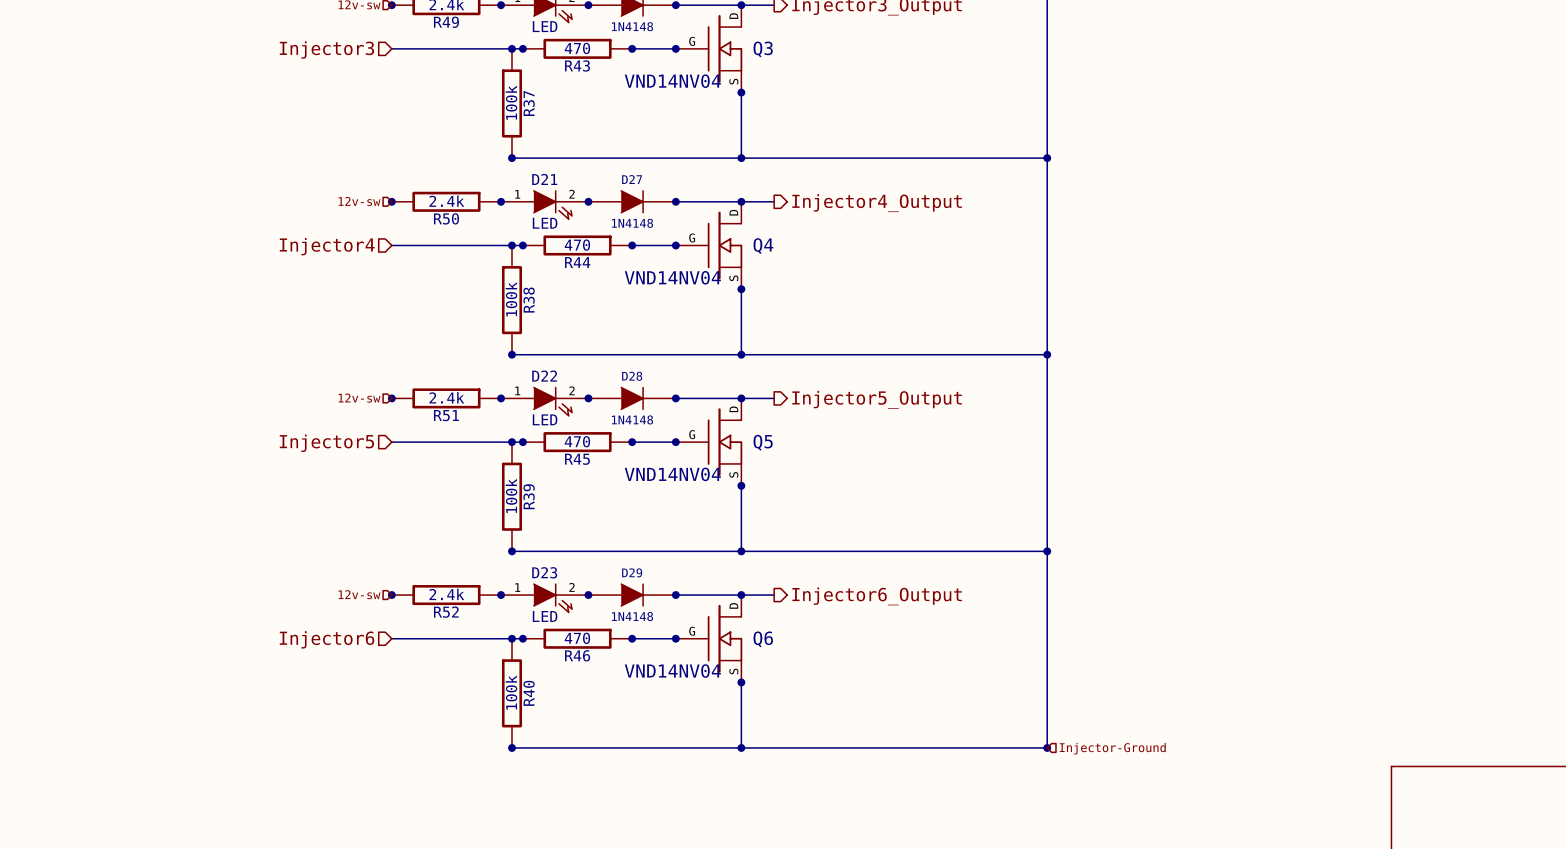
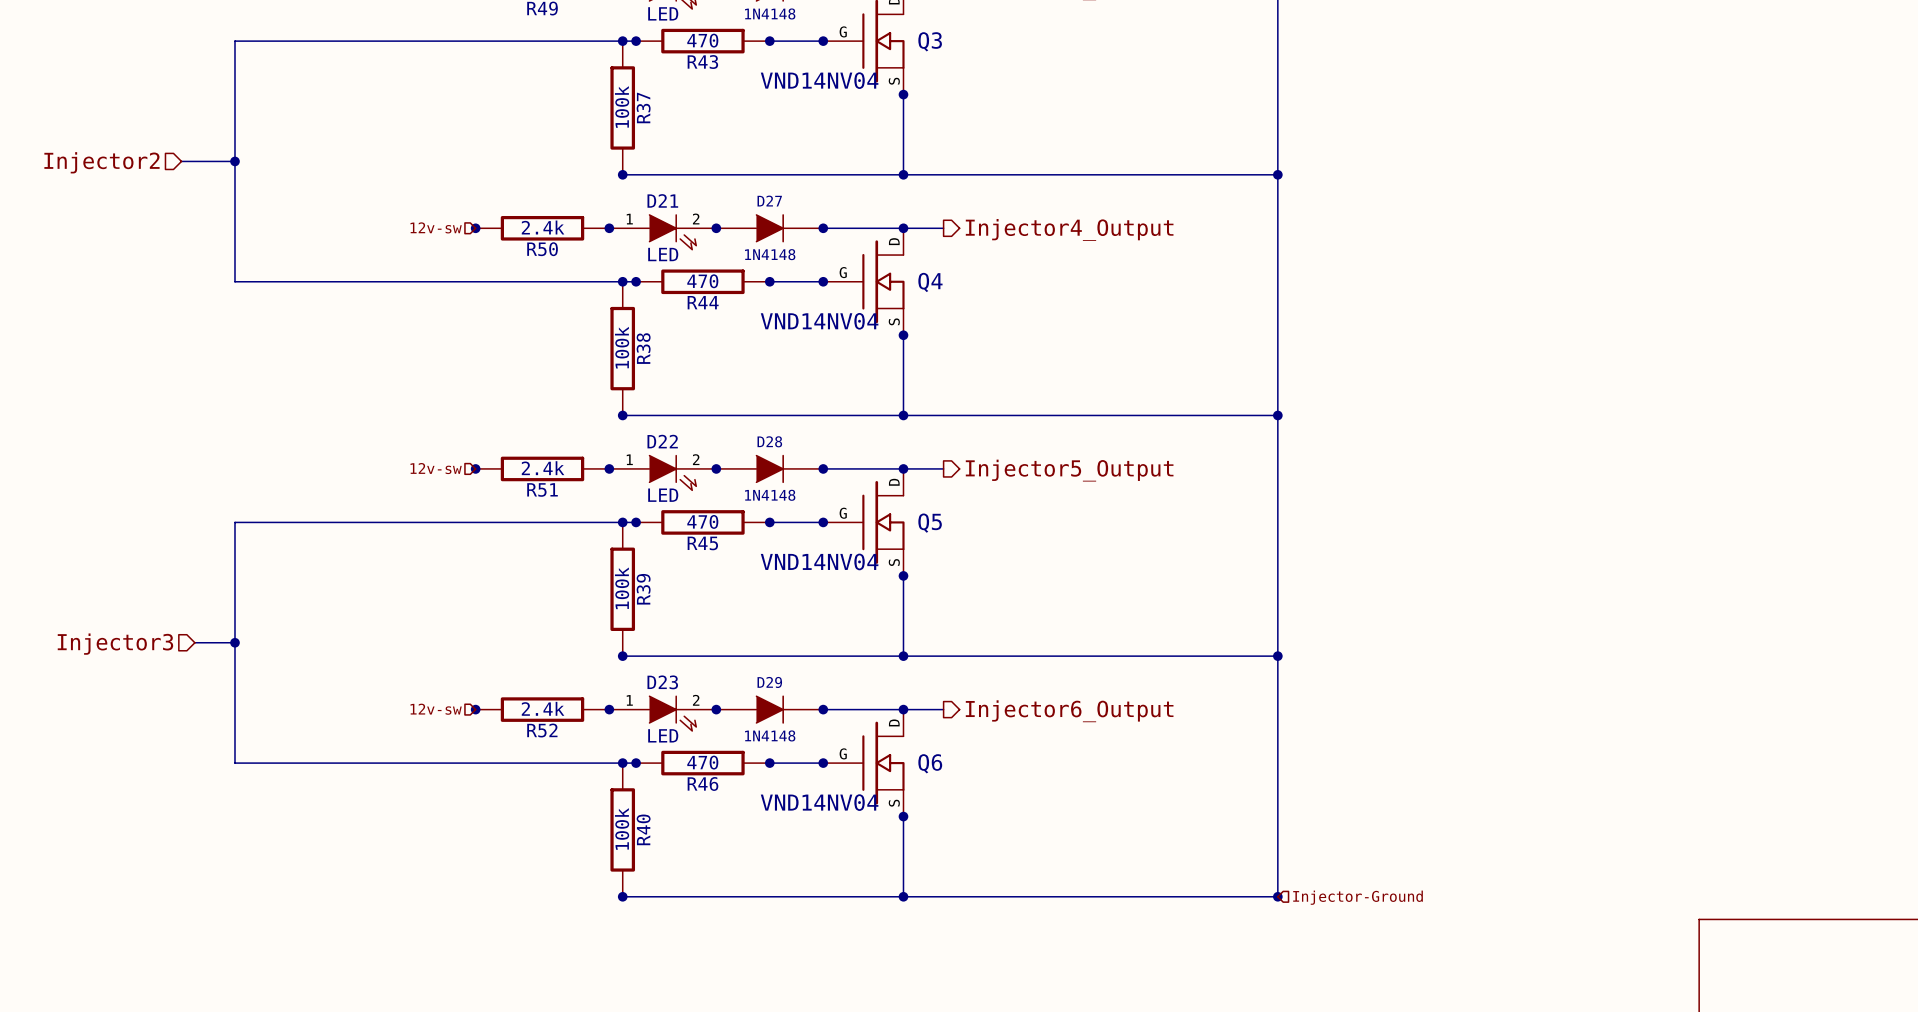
wire: none -> (475, 41) (234, 41) (234, 281) (475, 281)
hierarchical label: Injector3 (326, 49) -> none
wire: none -> (181, 161) (234, 161)
junction: none -> (234, 161)
hierarchical label: none -> Injector2 (101, 162)
hierarchical label: Injector4 (327, 246) -> none
wire: none -> (475, 522) (234, 522) (234, 763) (475, 763)
hierarchical label: Injector5 (326, 443) -> none
wire: none -> (194, 642) (234, 642)
junction: none -> (234, 642)
hierarchical label: none -> Injector3 (115, 644)
hierarchical label: Injector6 (327, 639) -> none

